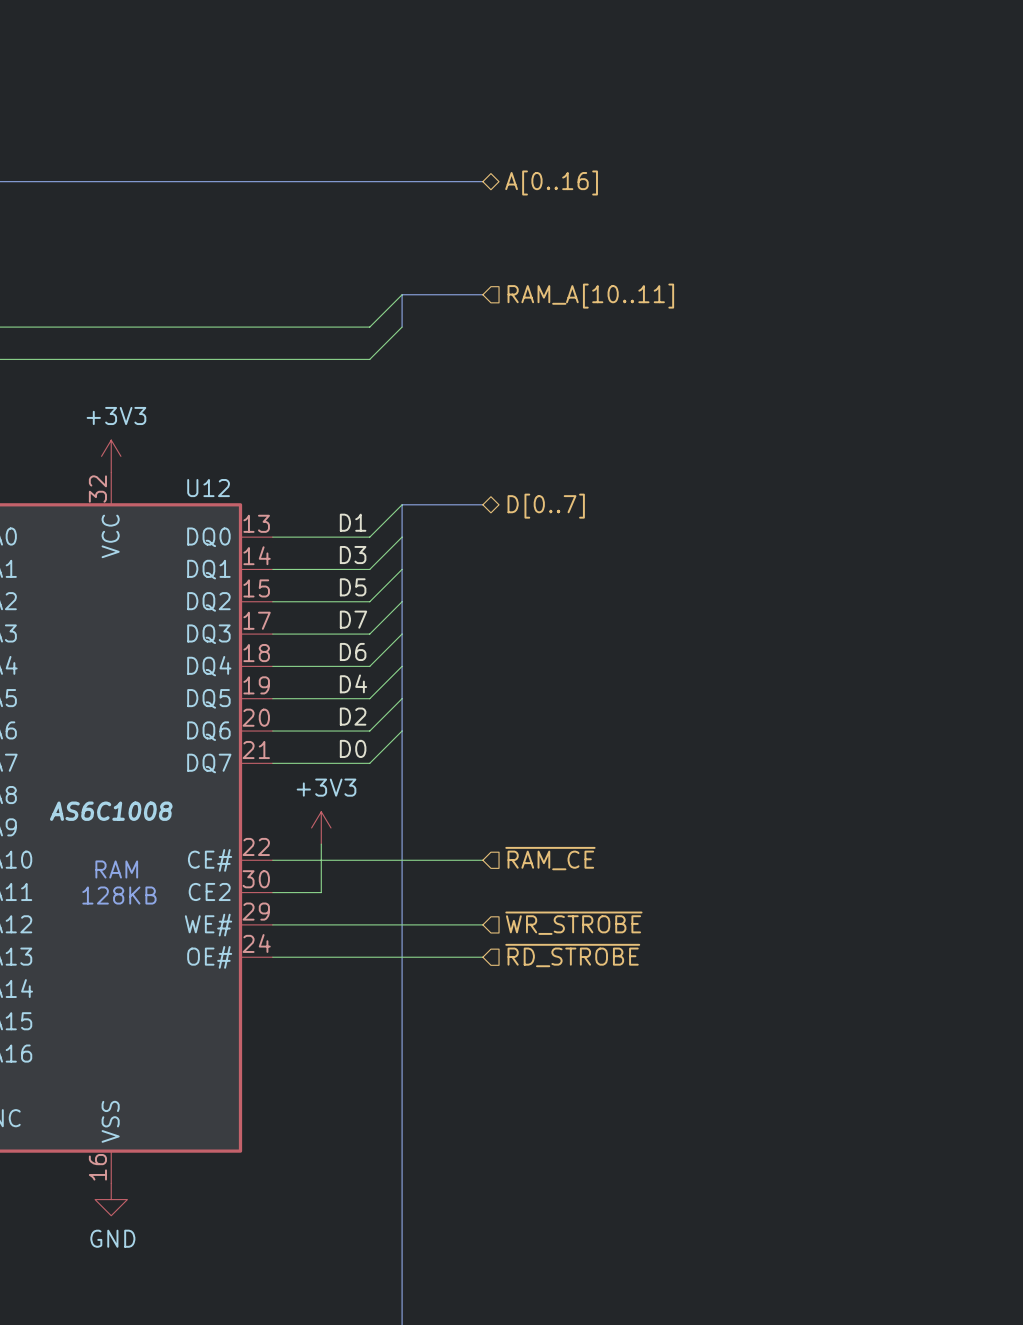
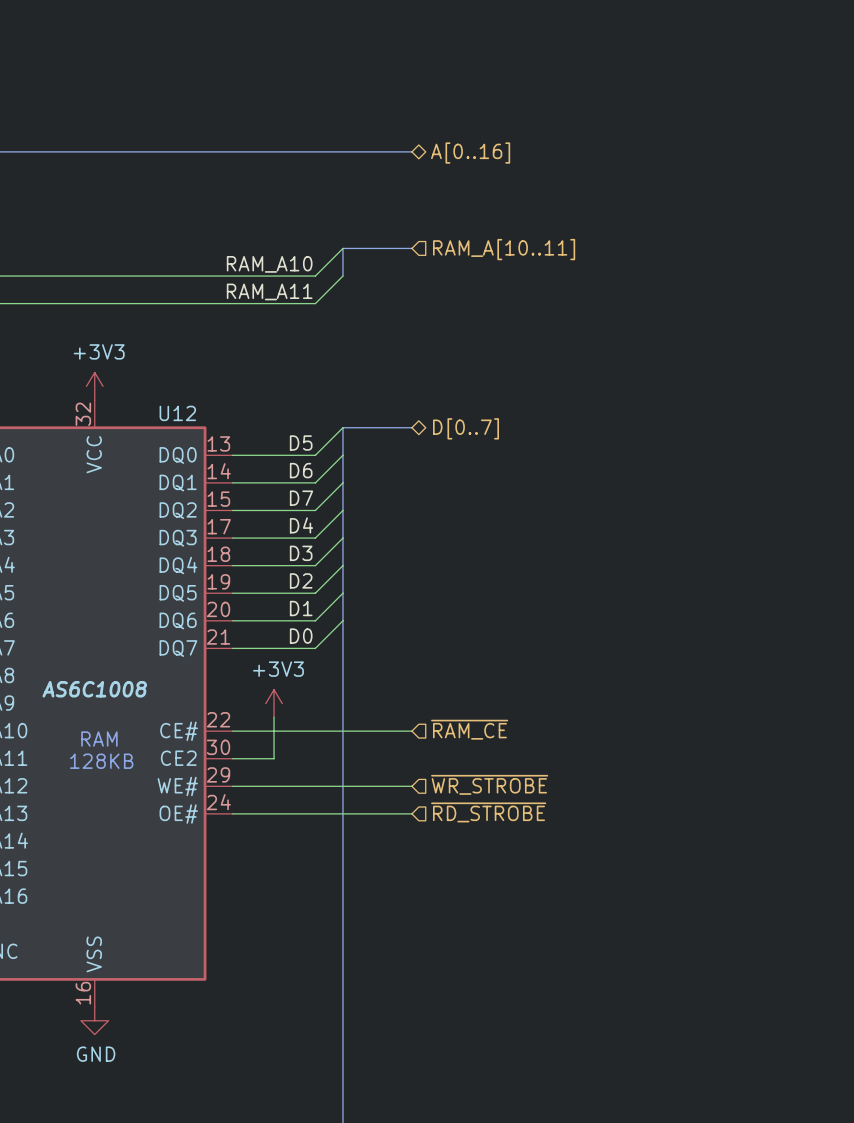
label: none -> RAM_A10 (269, 264)
label: none -> RAM_A11 (269, 291)
label: D1 (353, 522) -> D5 (301, 443)
label: D3 (353, 555) -> D6 (301, 470)
label: D5 (353, 587) -> D7 (301, 498)
label: D7 (353, 619) -> D4 (301, 525)
label: D6 (353, 651) -> D3 (301, 553)
label: D4 (353, 683) -> D2 (301, 580)
label: D2 (353, 716) -> D1 (301, 608)

